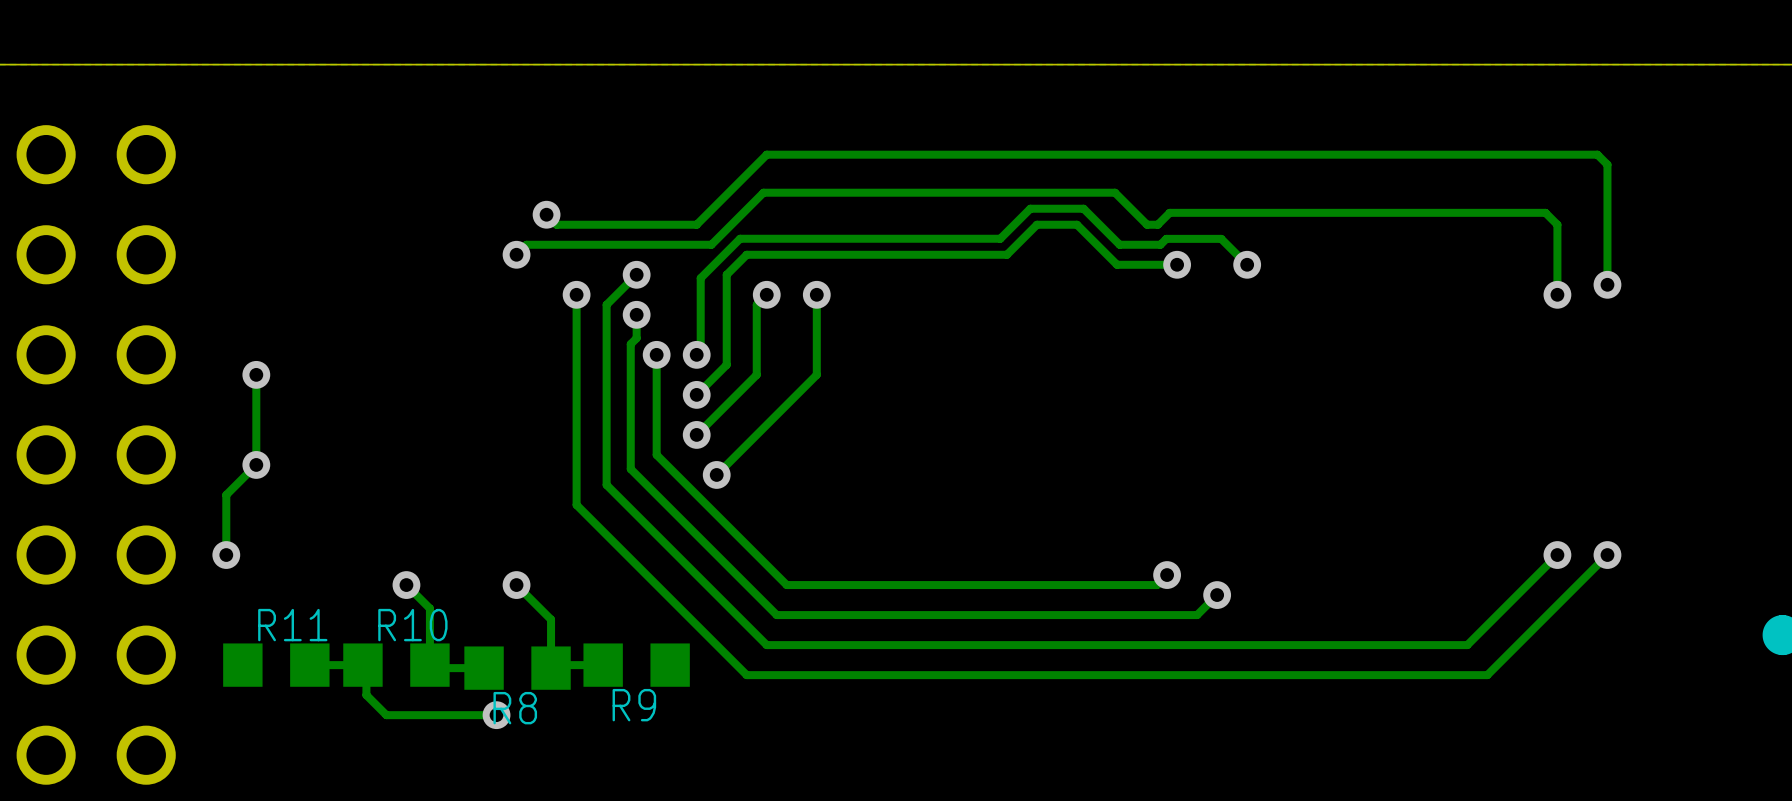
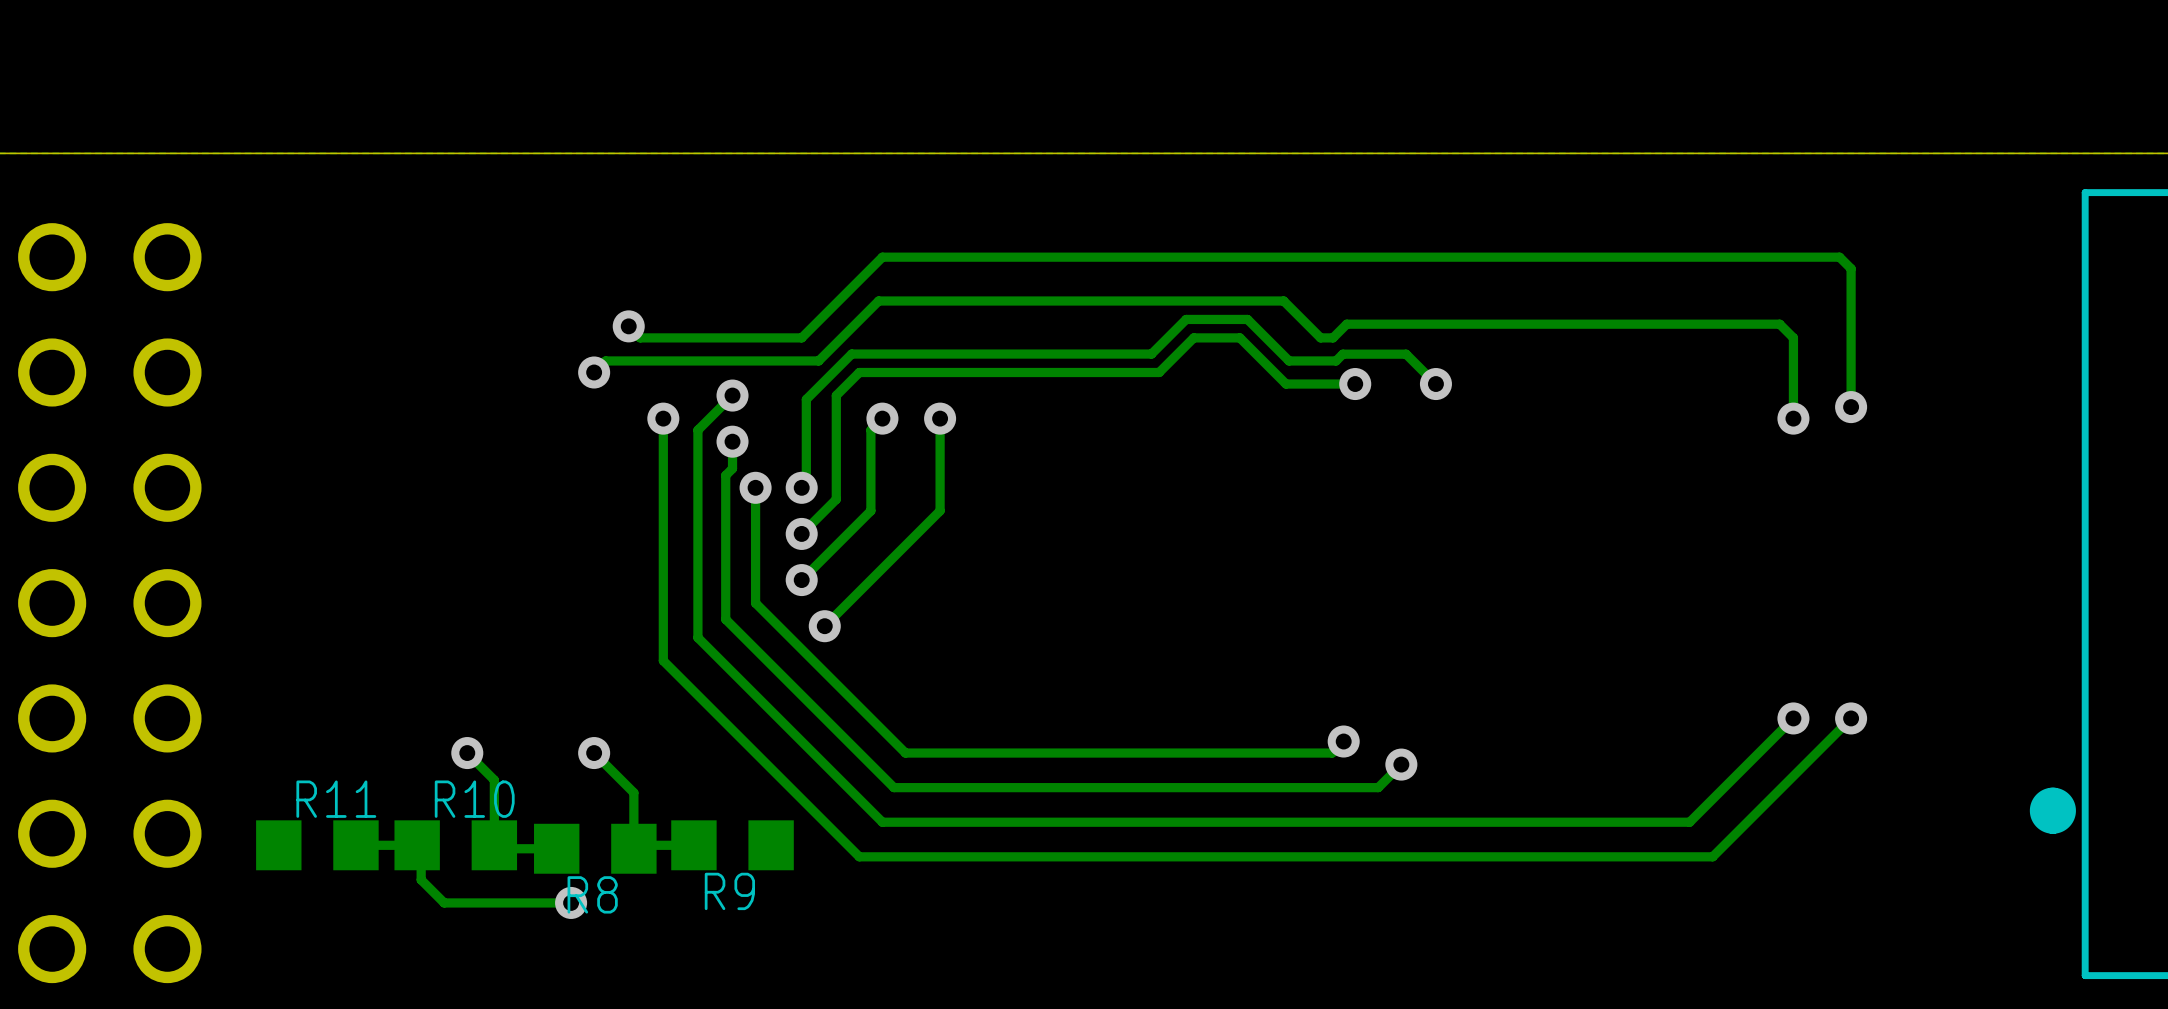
track: (256, 374) (256, 464) (226, 494) (226, 555) -> none
via: (256, 374) -> none
via: (256, 464) -> none
via: (226, 555) -> none

